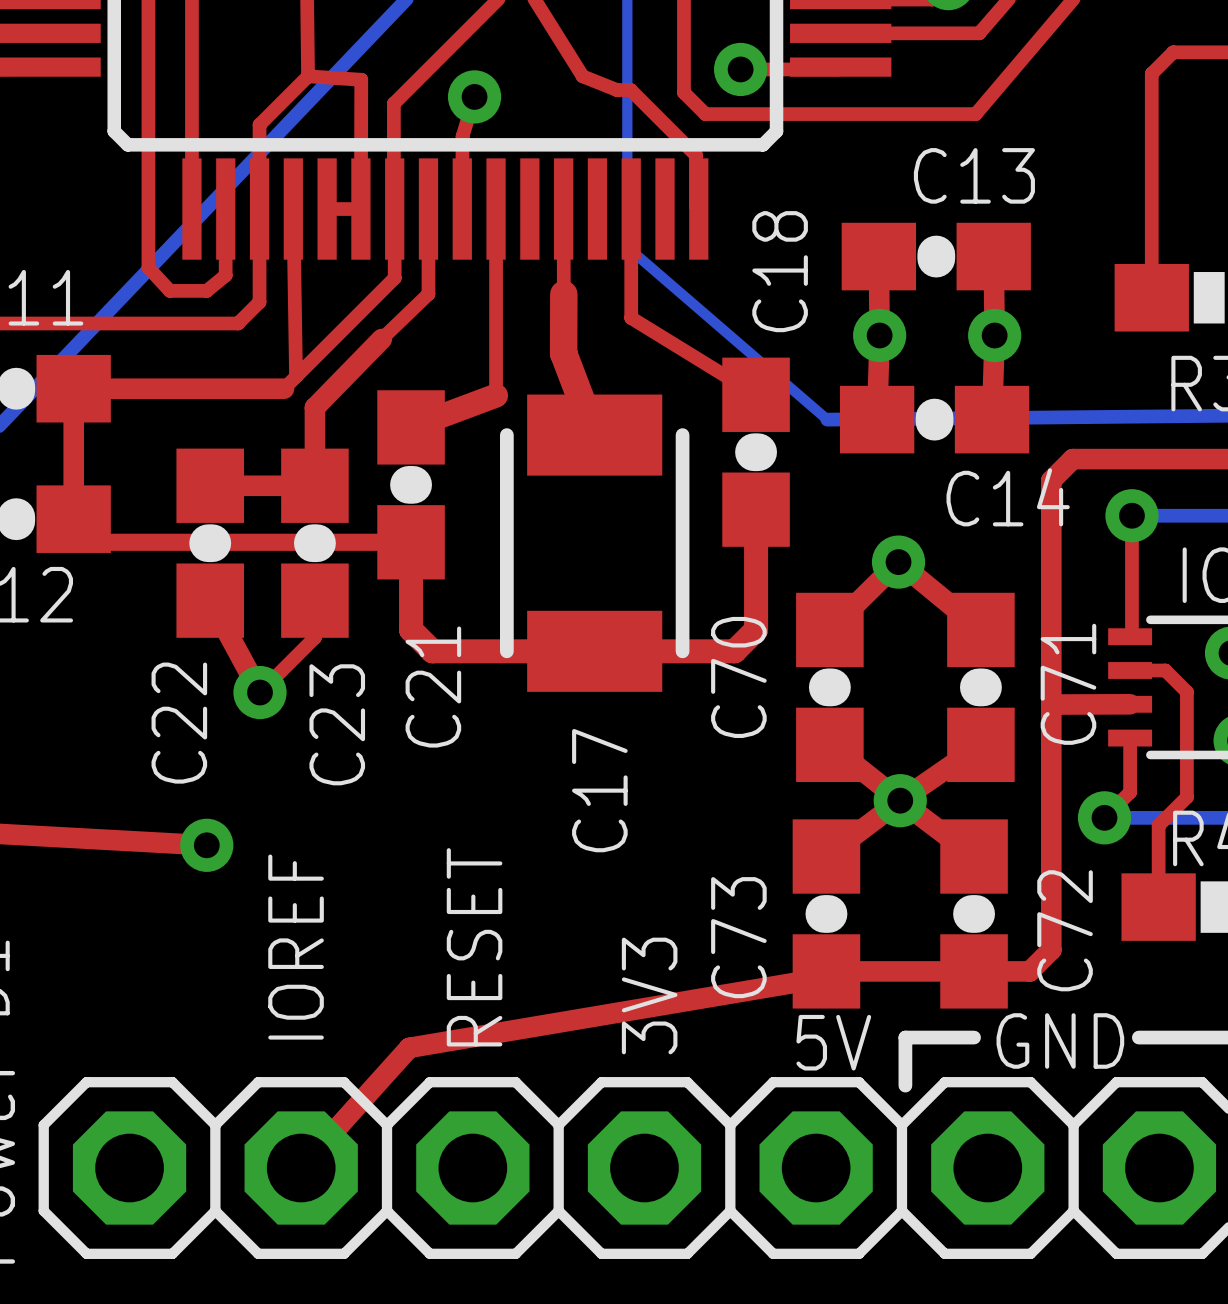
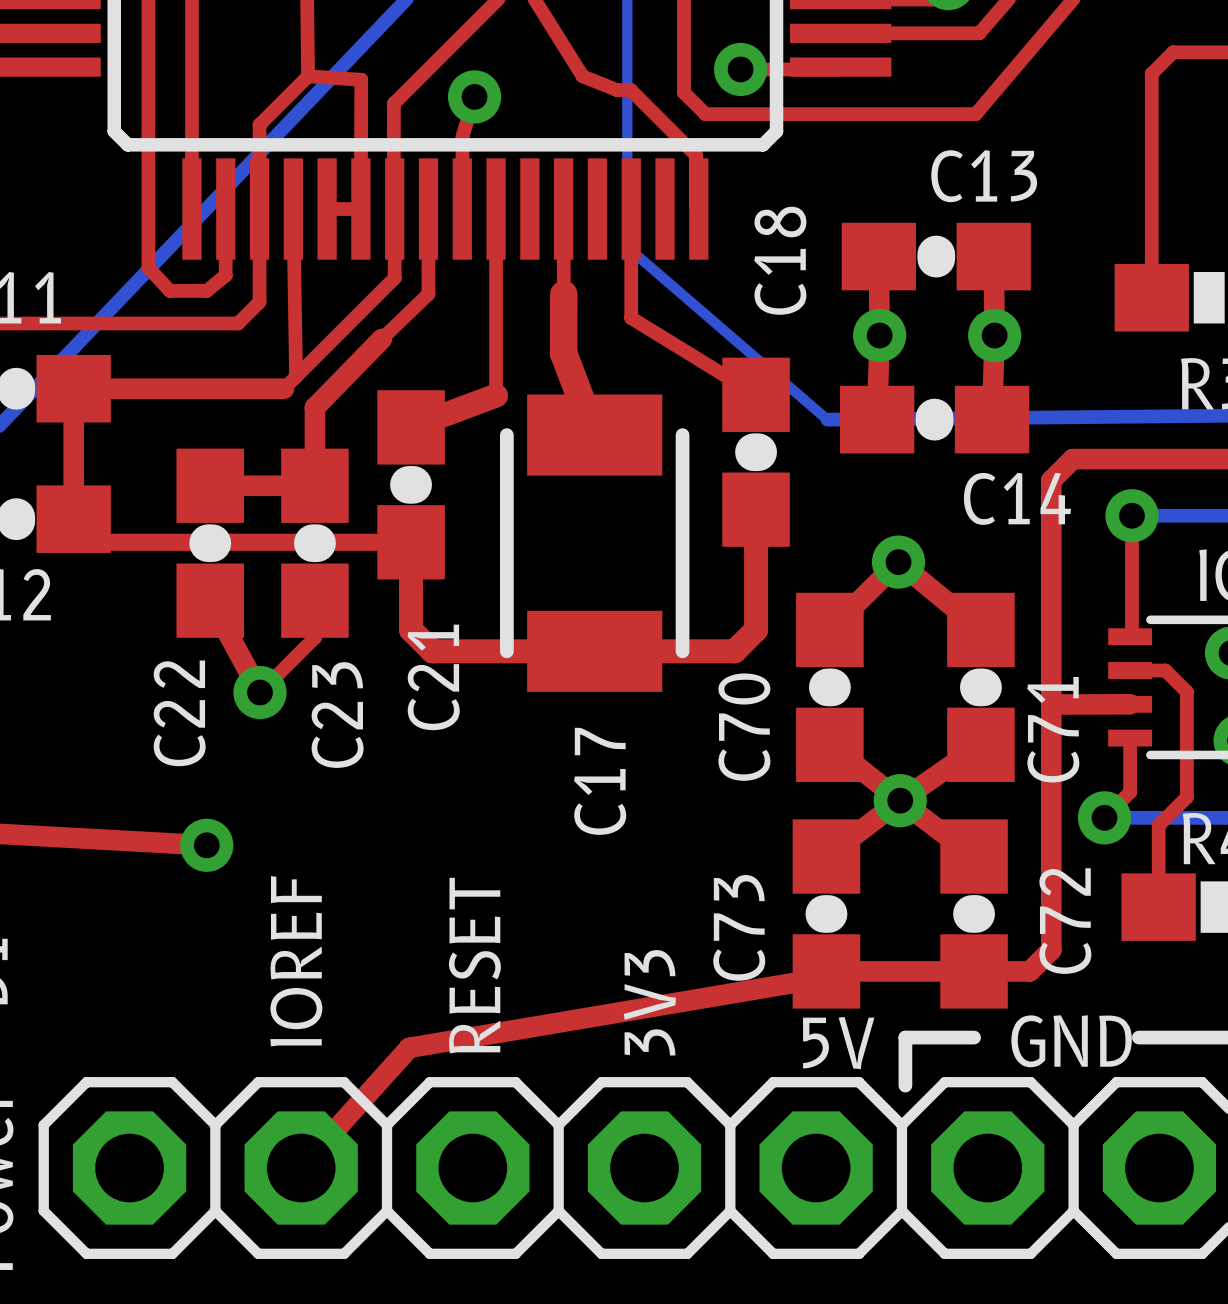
C70 name position: C70 (738, 677) -> C70 (744, 727)
C71 name position: C71 (1068, 684) -> C71 (1053, 729)

